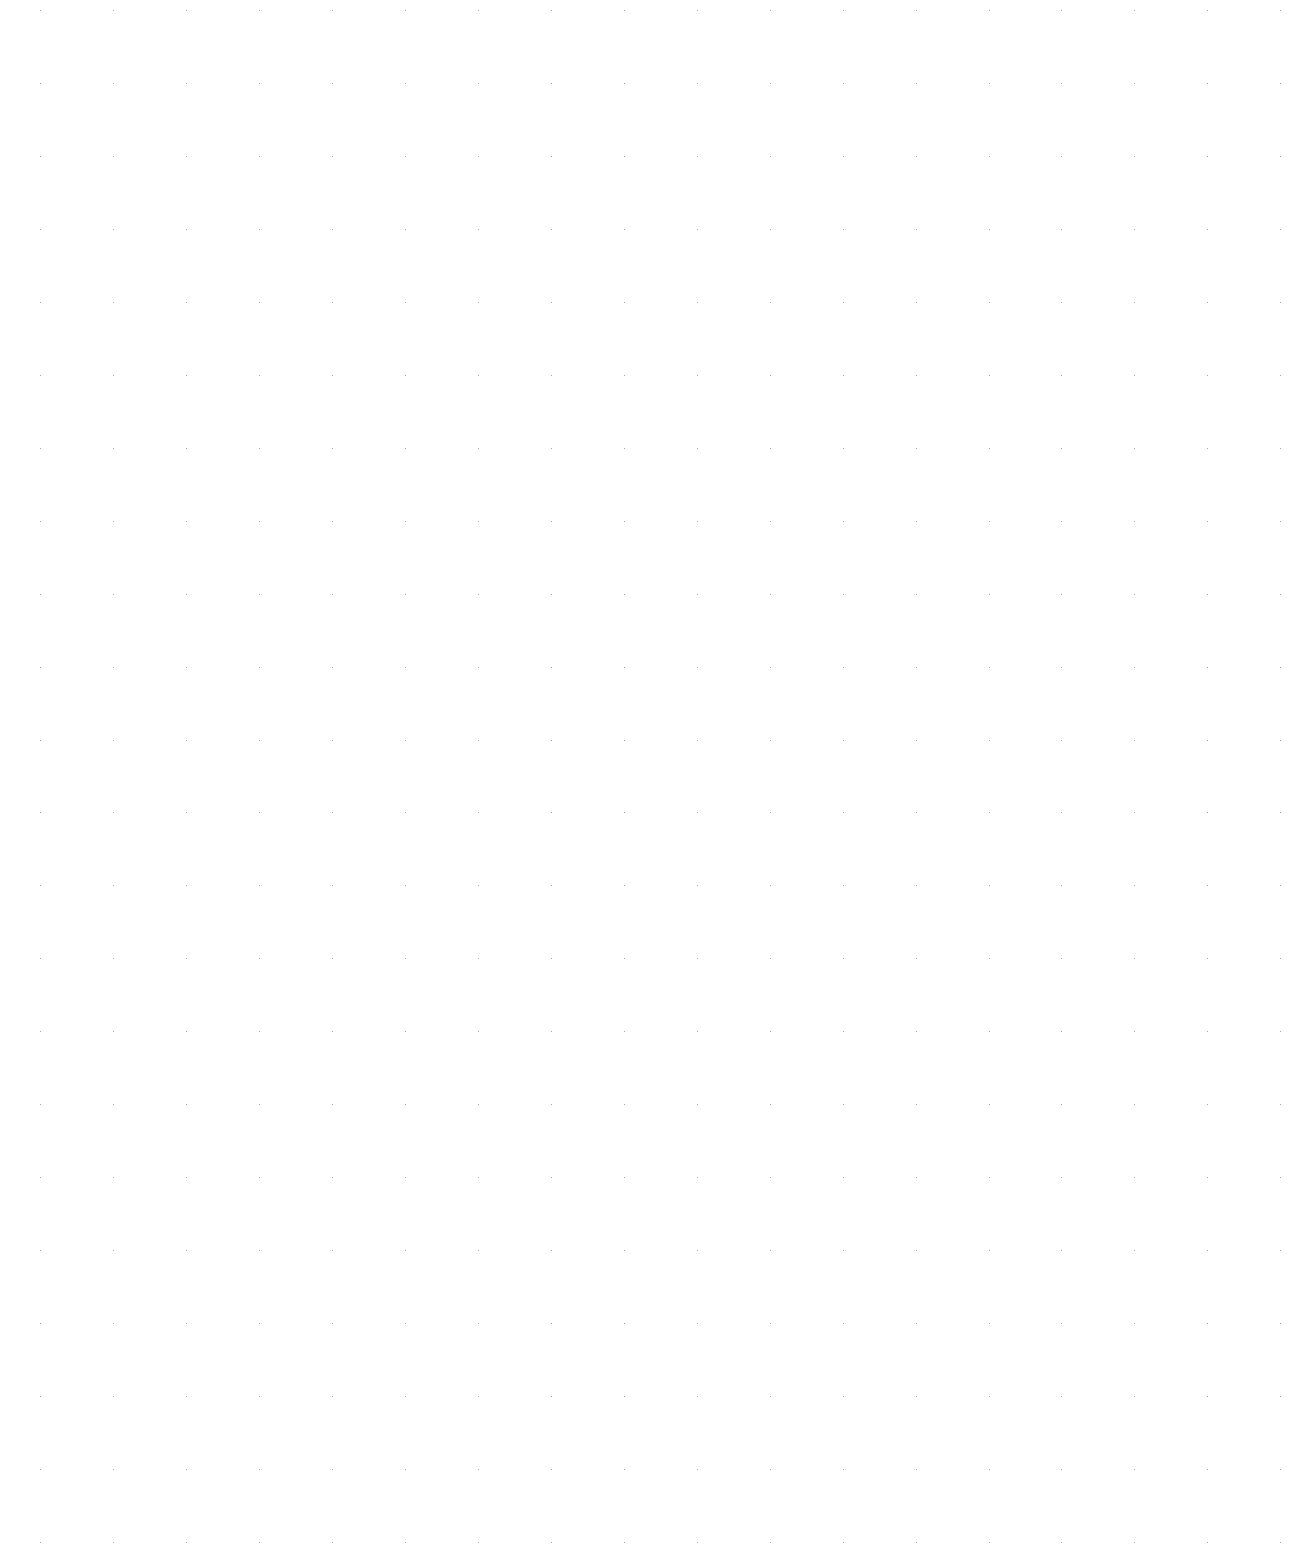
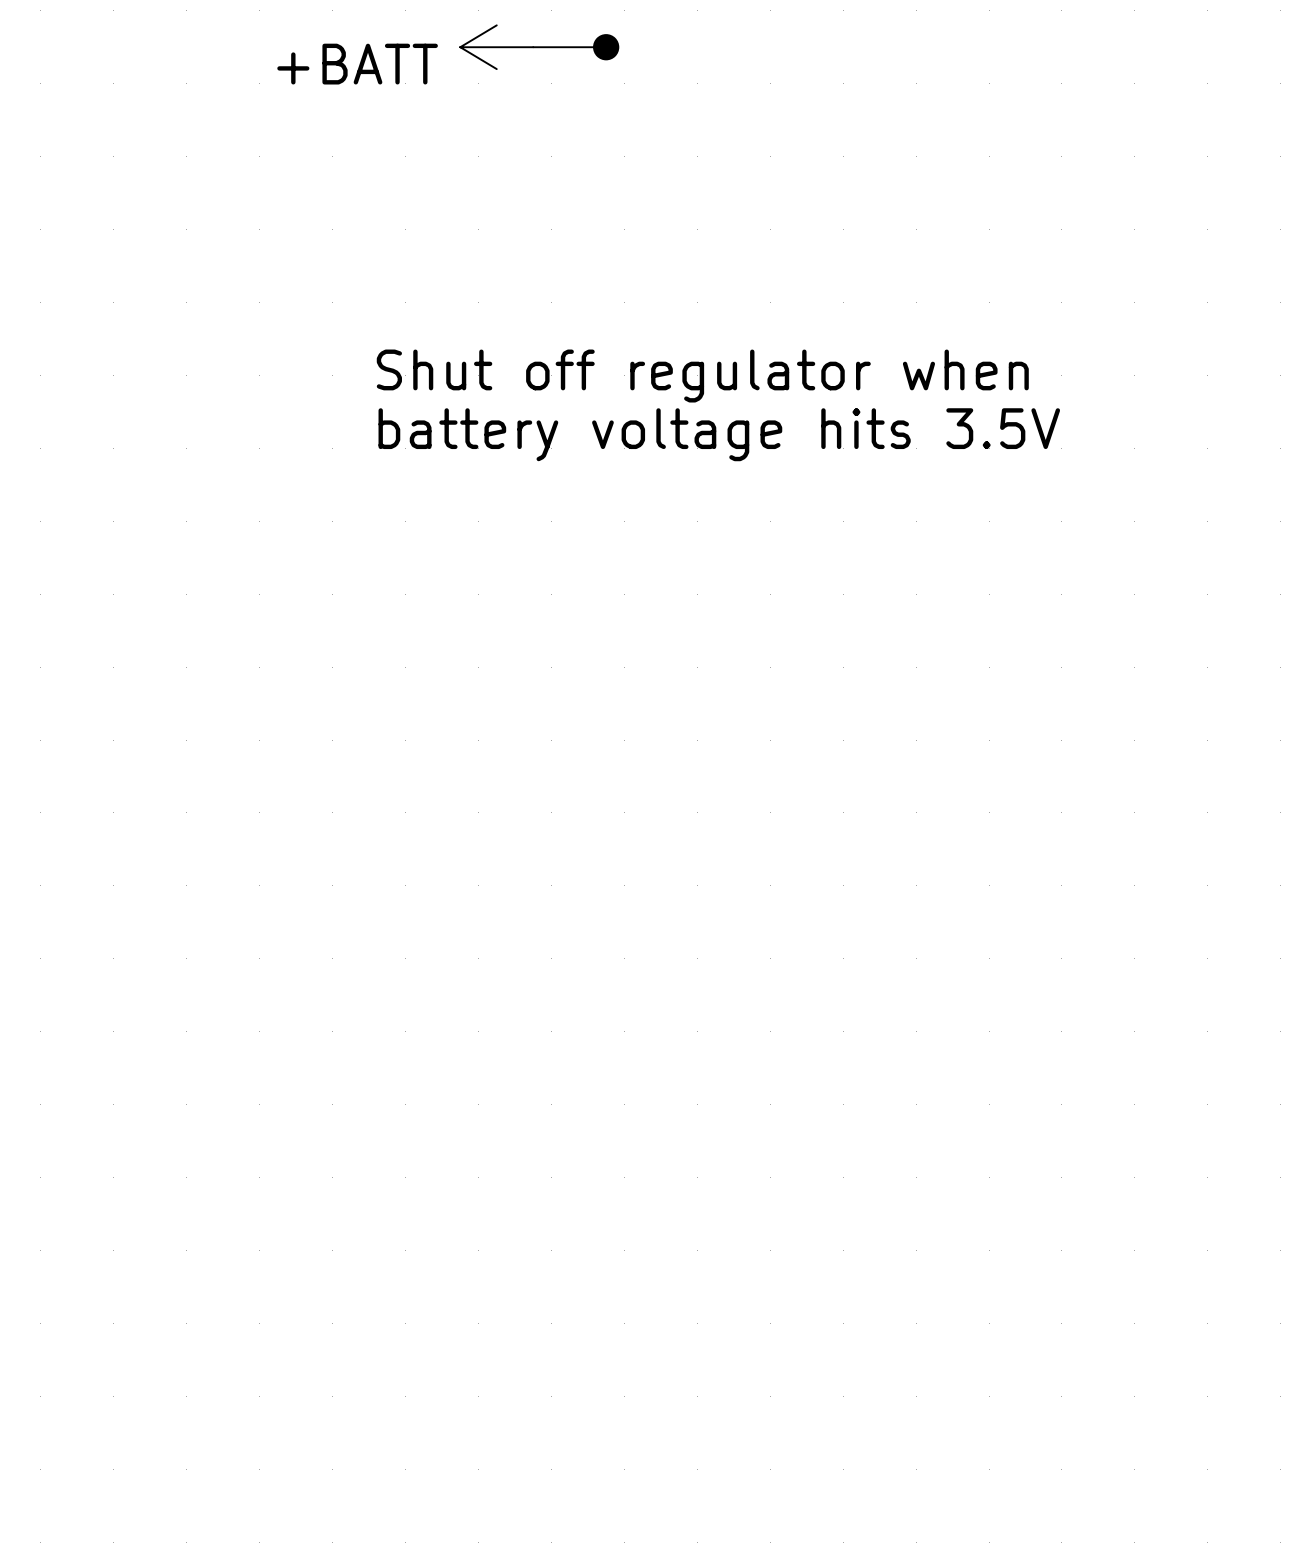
power symbol: none -> +BATT (496, 47)
wire: none -> (533, 47) (606, 47)
junction: none -> (606, 47)
text: none -> Shut off regulator when (702, 376)
text: none -> battery voltage hits 3.5V (719, 434)

